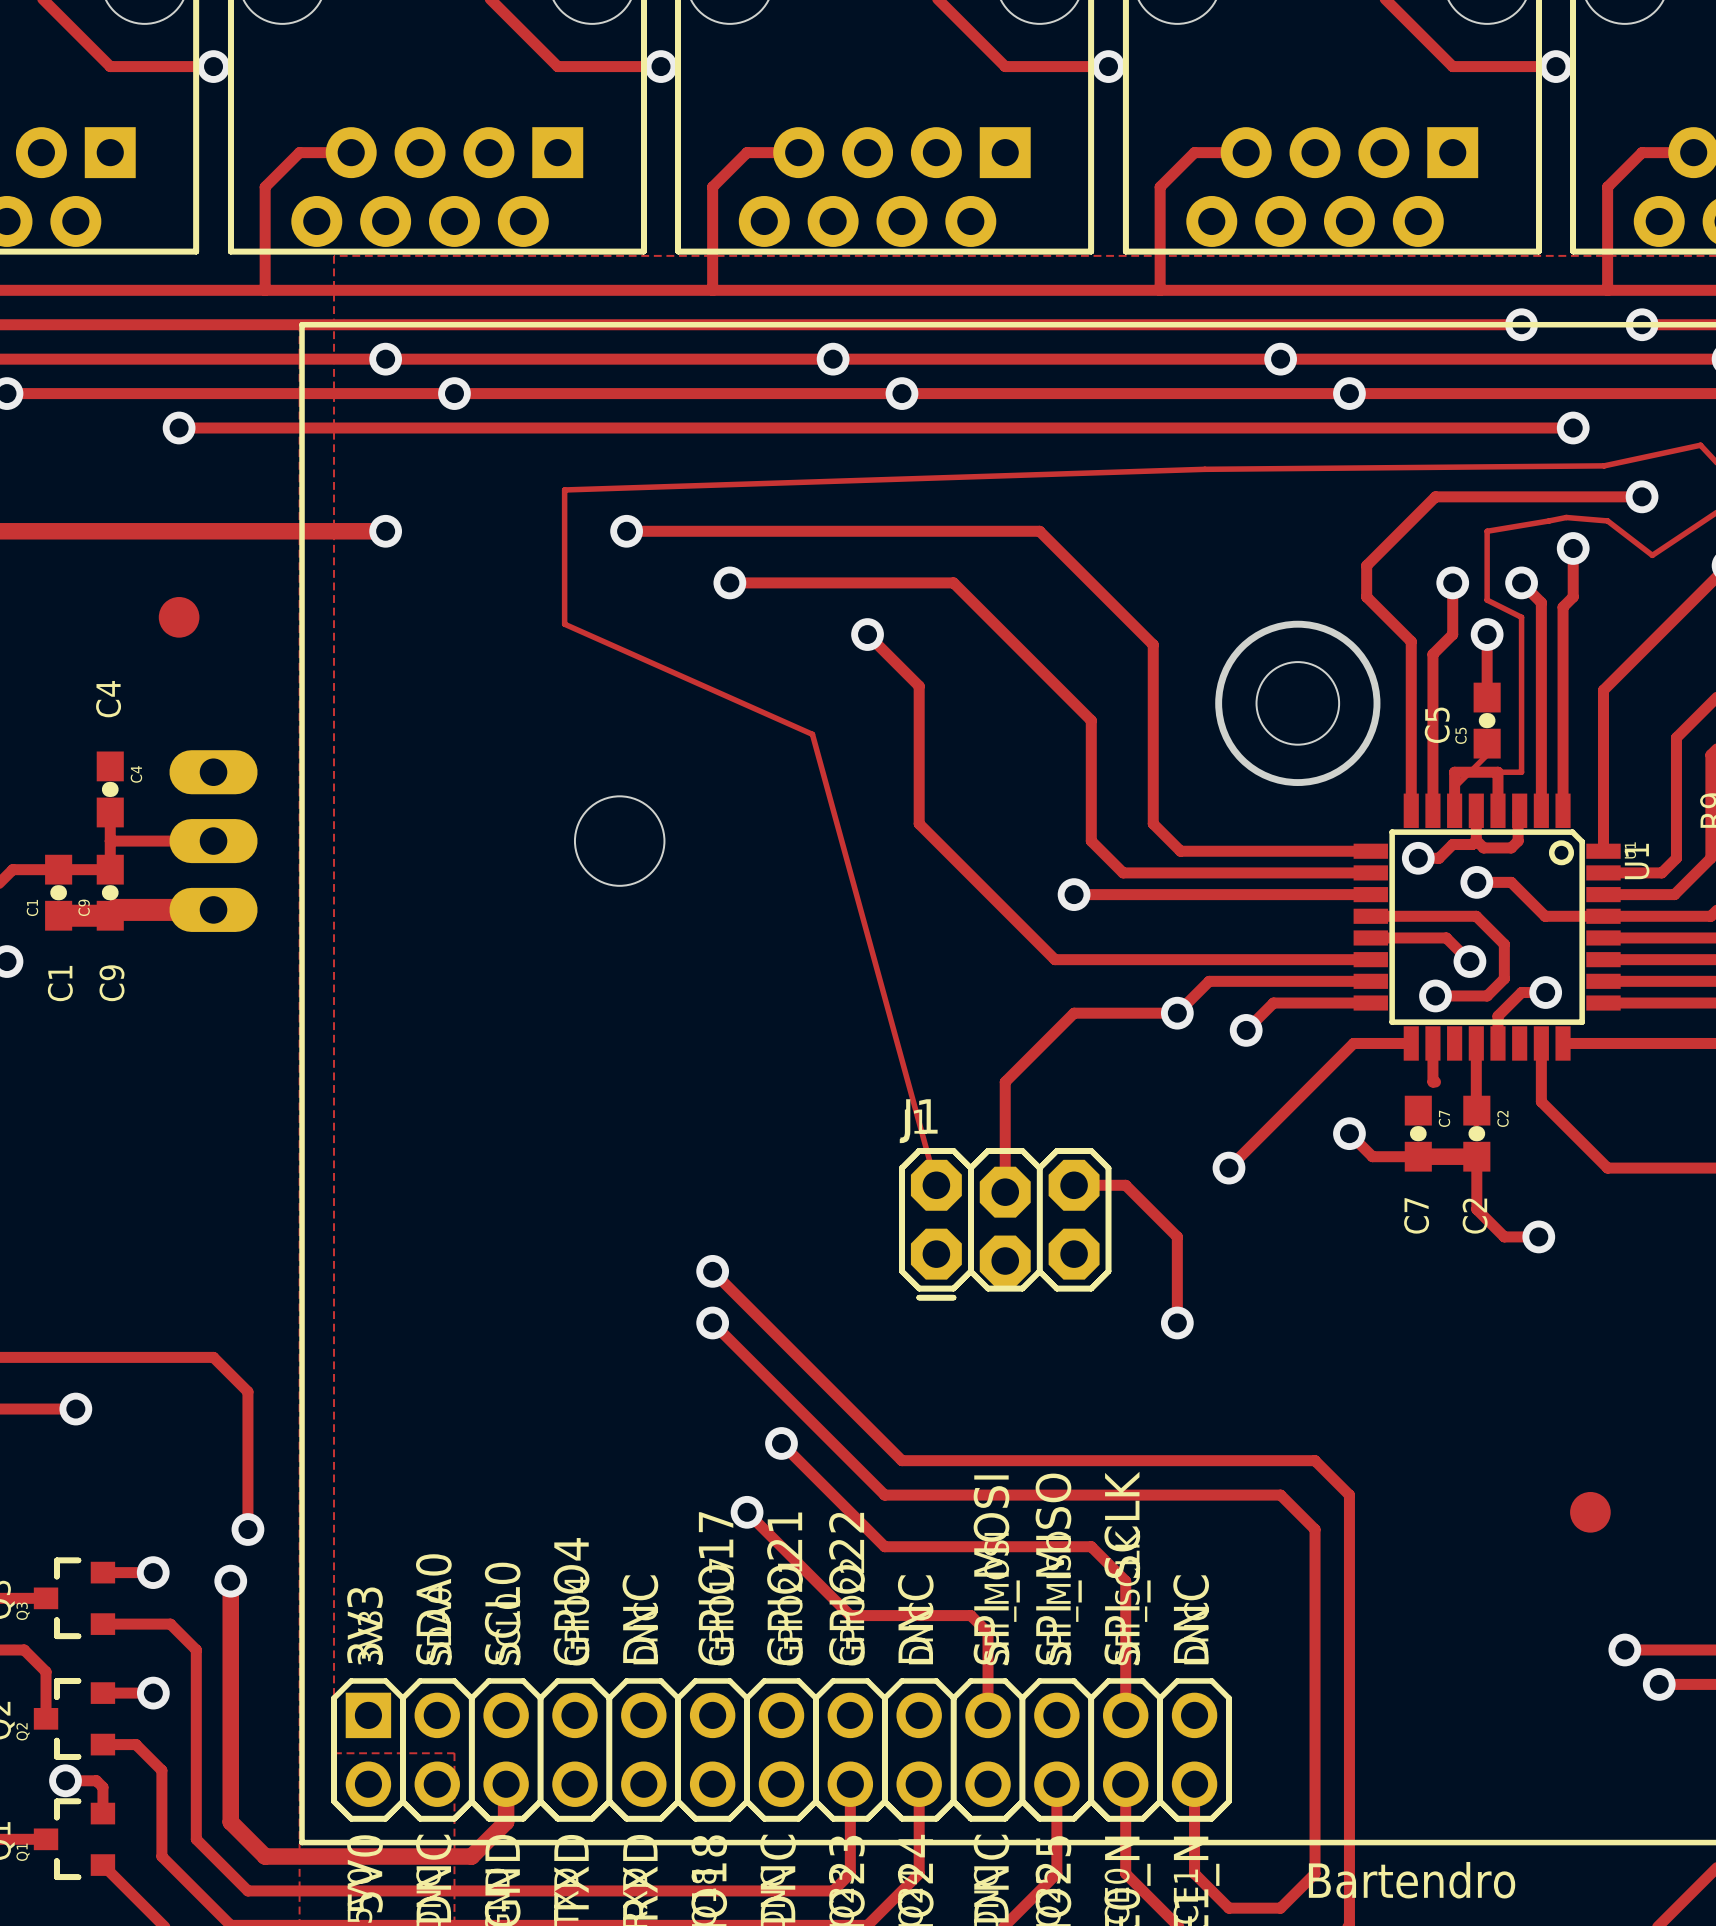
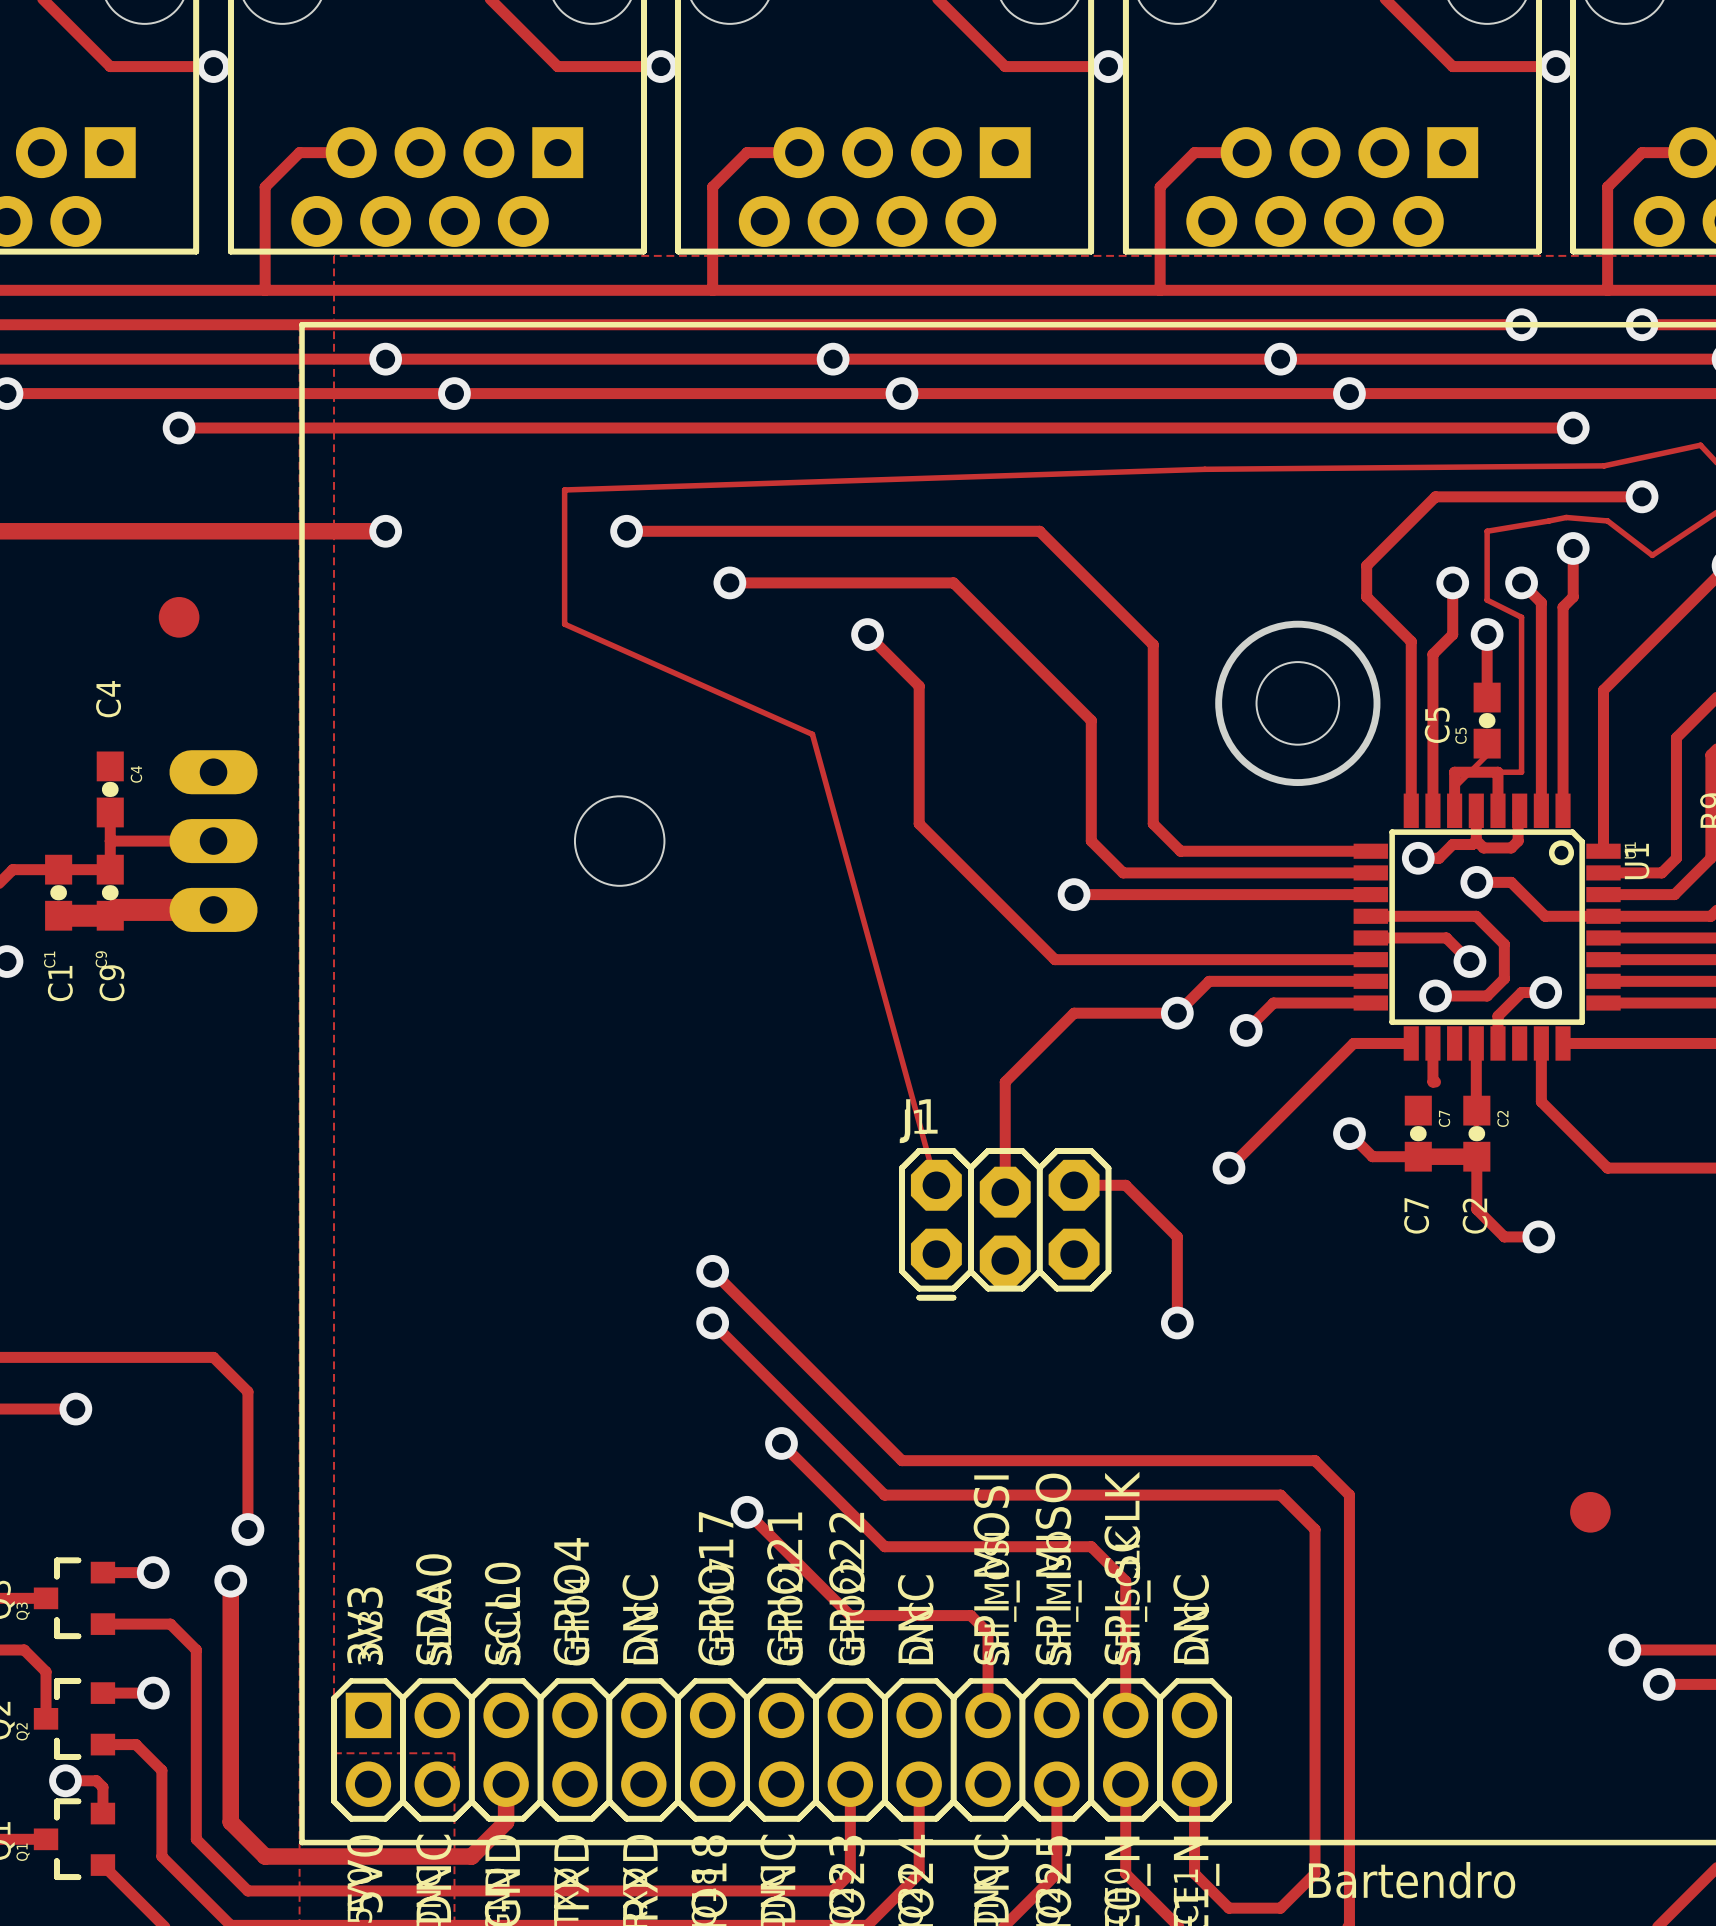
C1 name position: C1 (32, 907) -> C1 (49, 959)
C9 name position: C9 (84, 907) -> C9 (101, 959)

